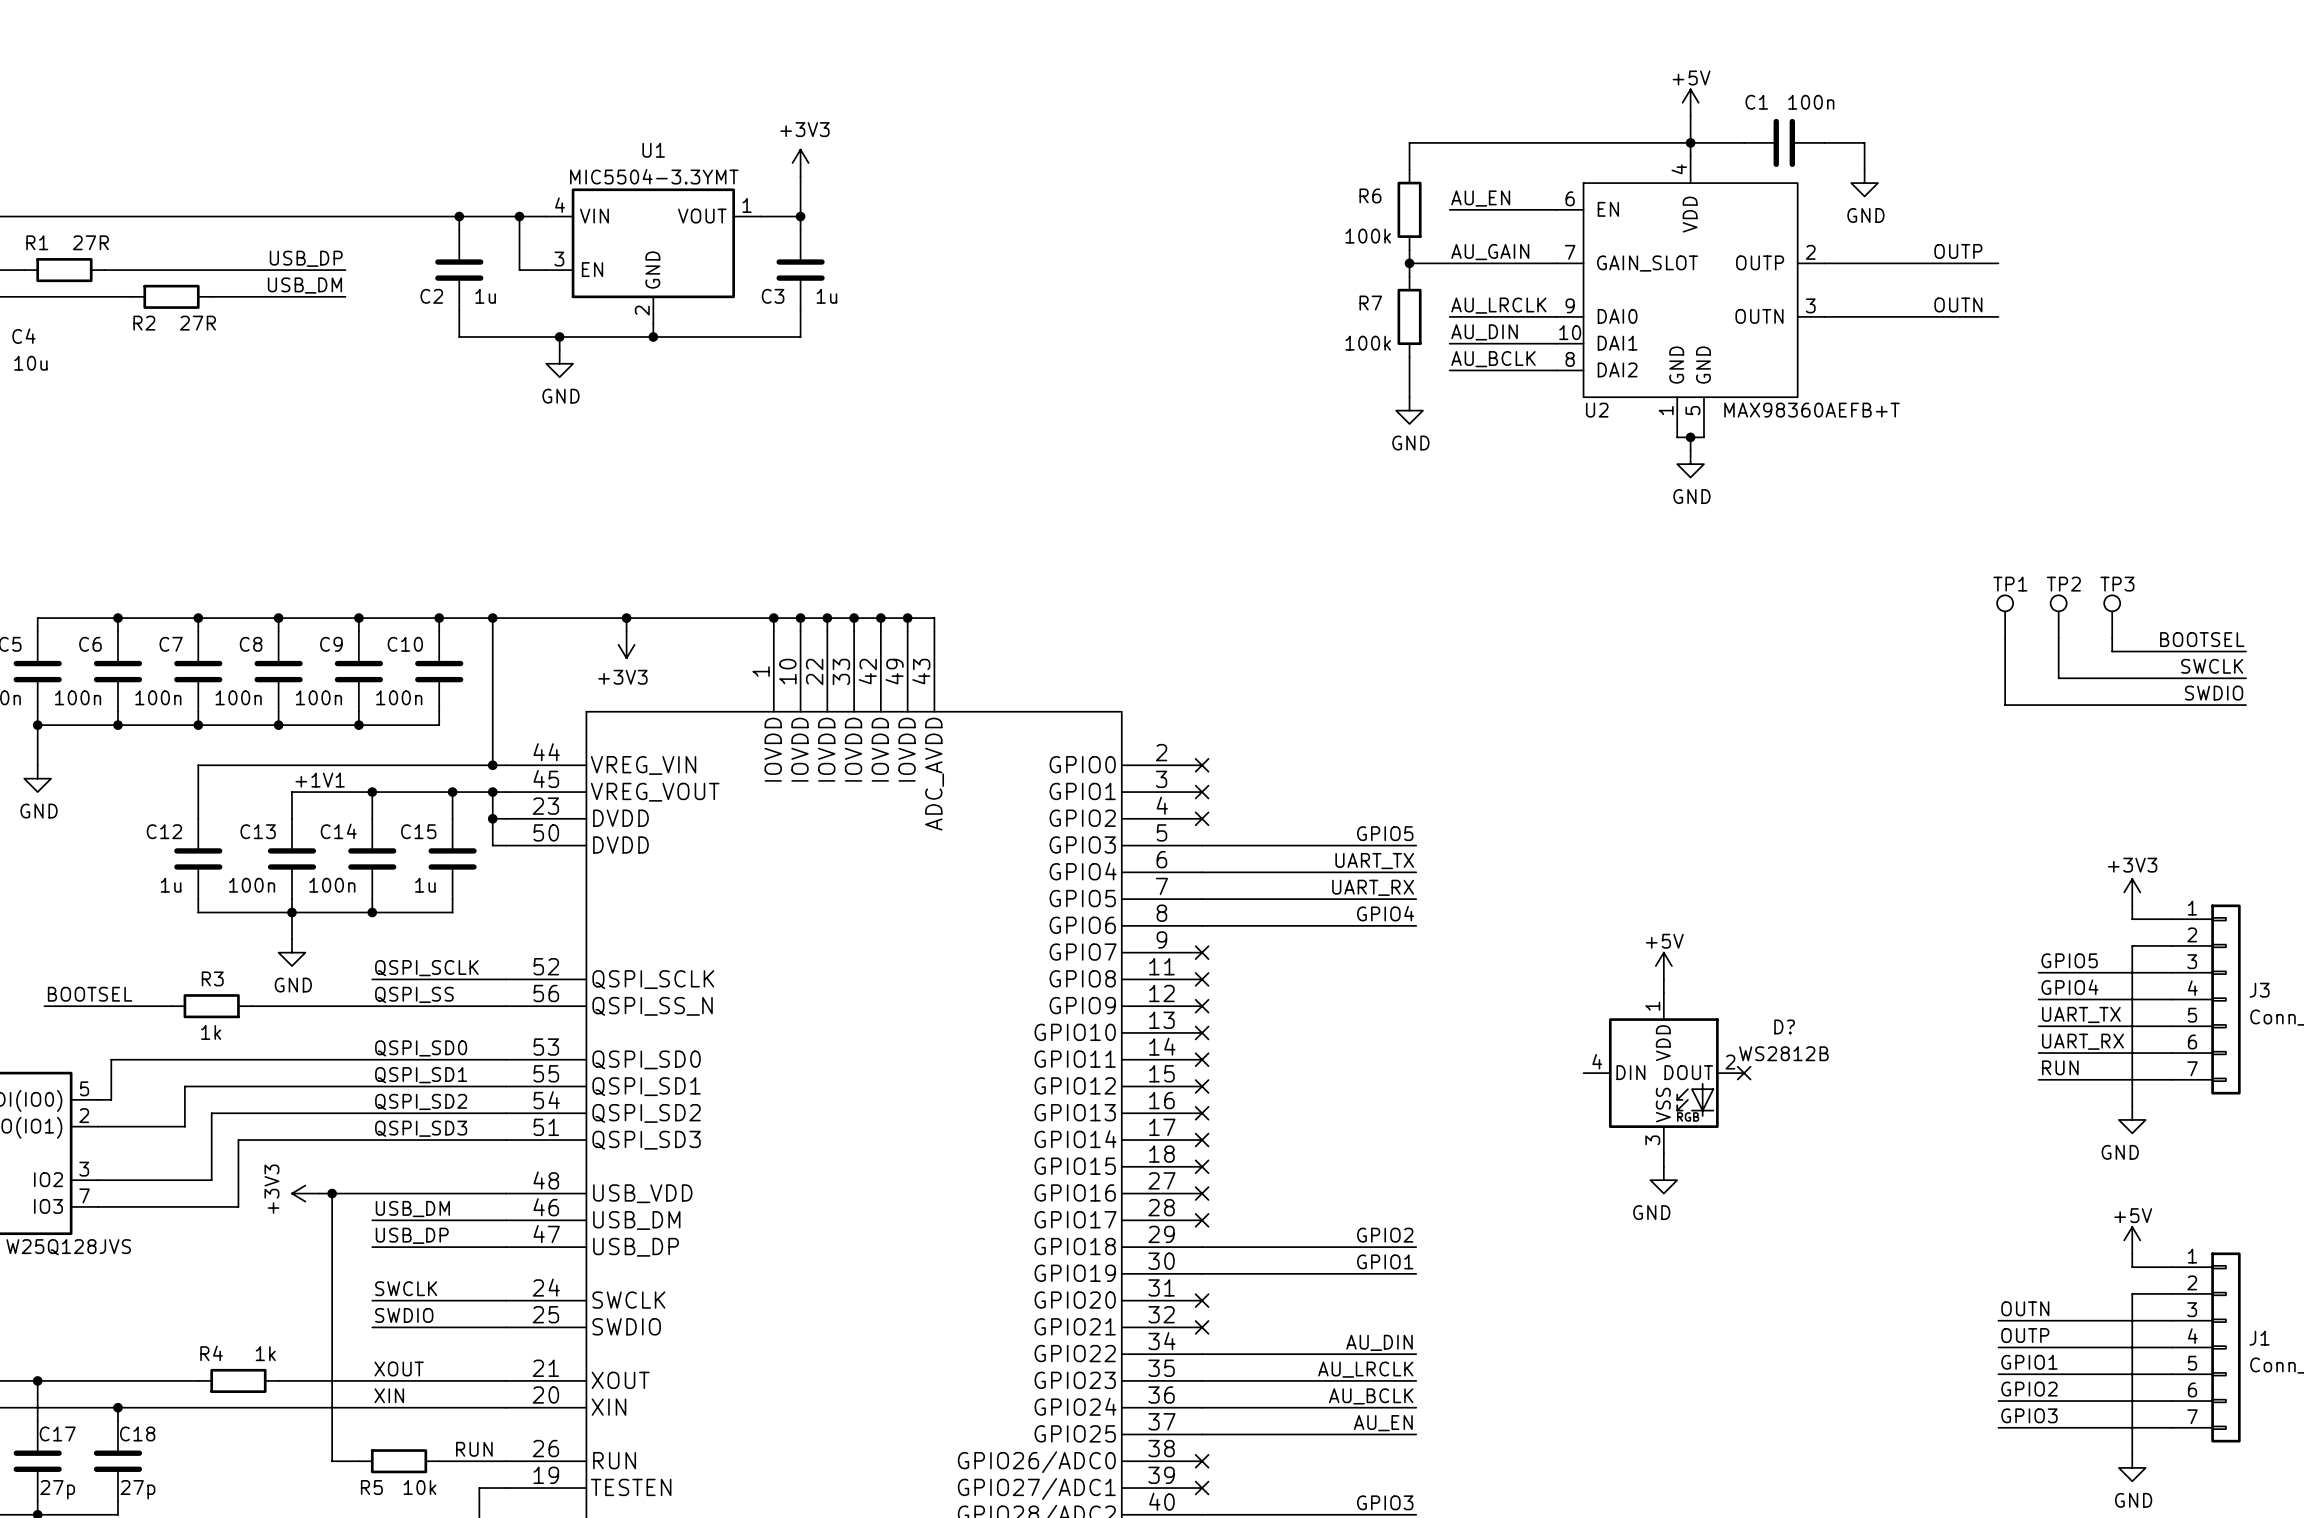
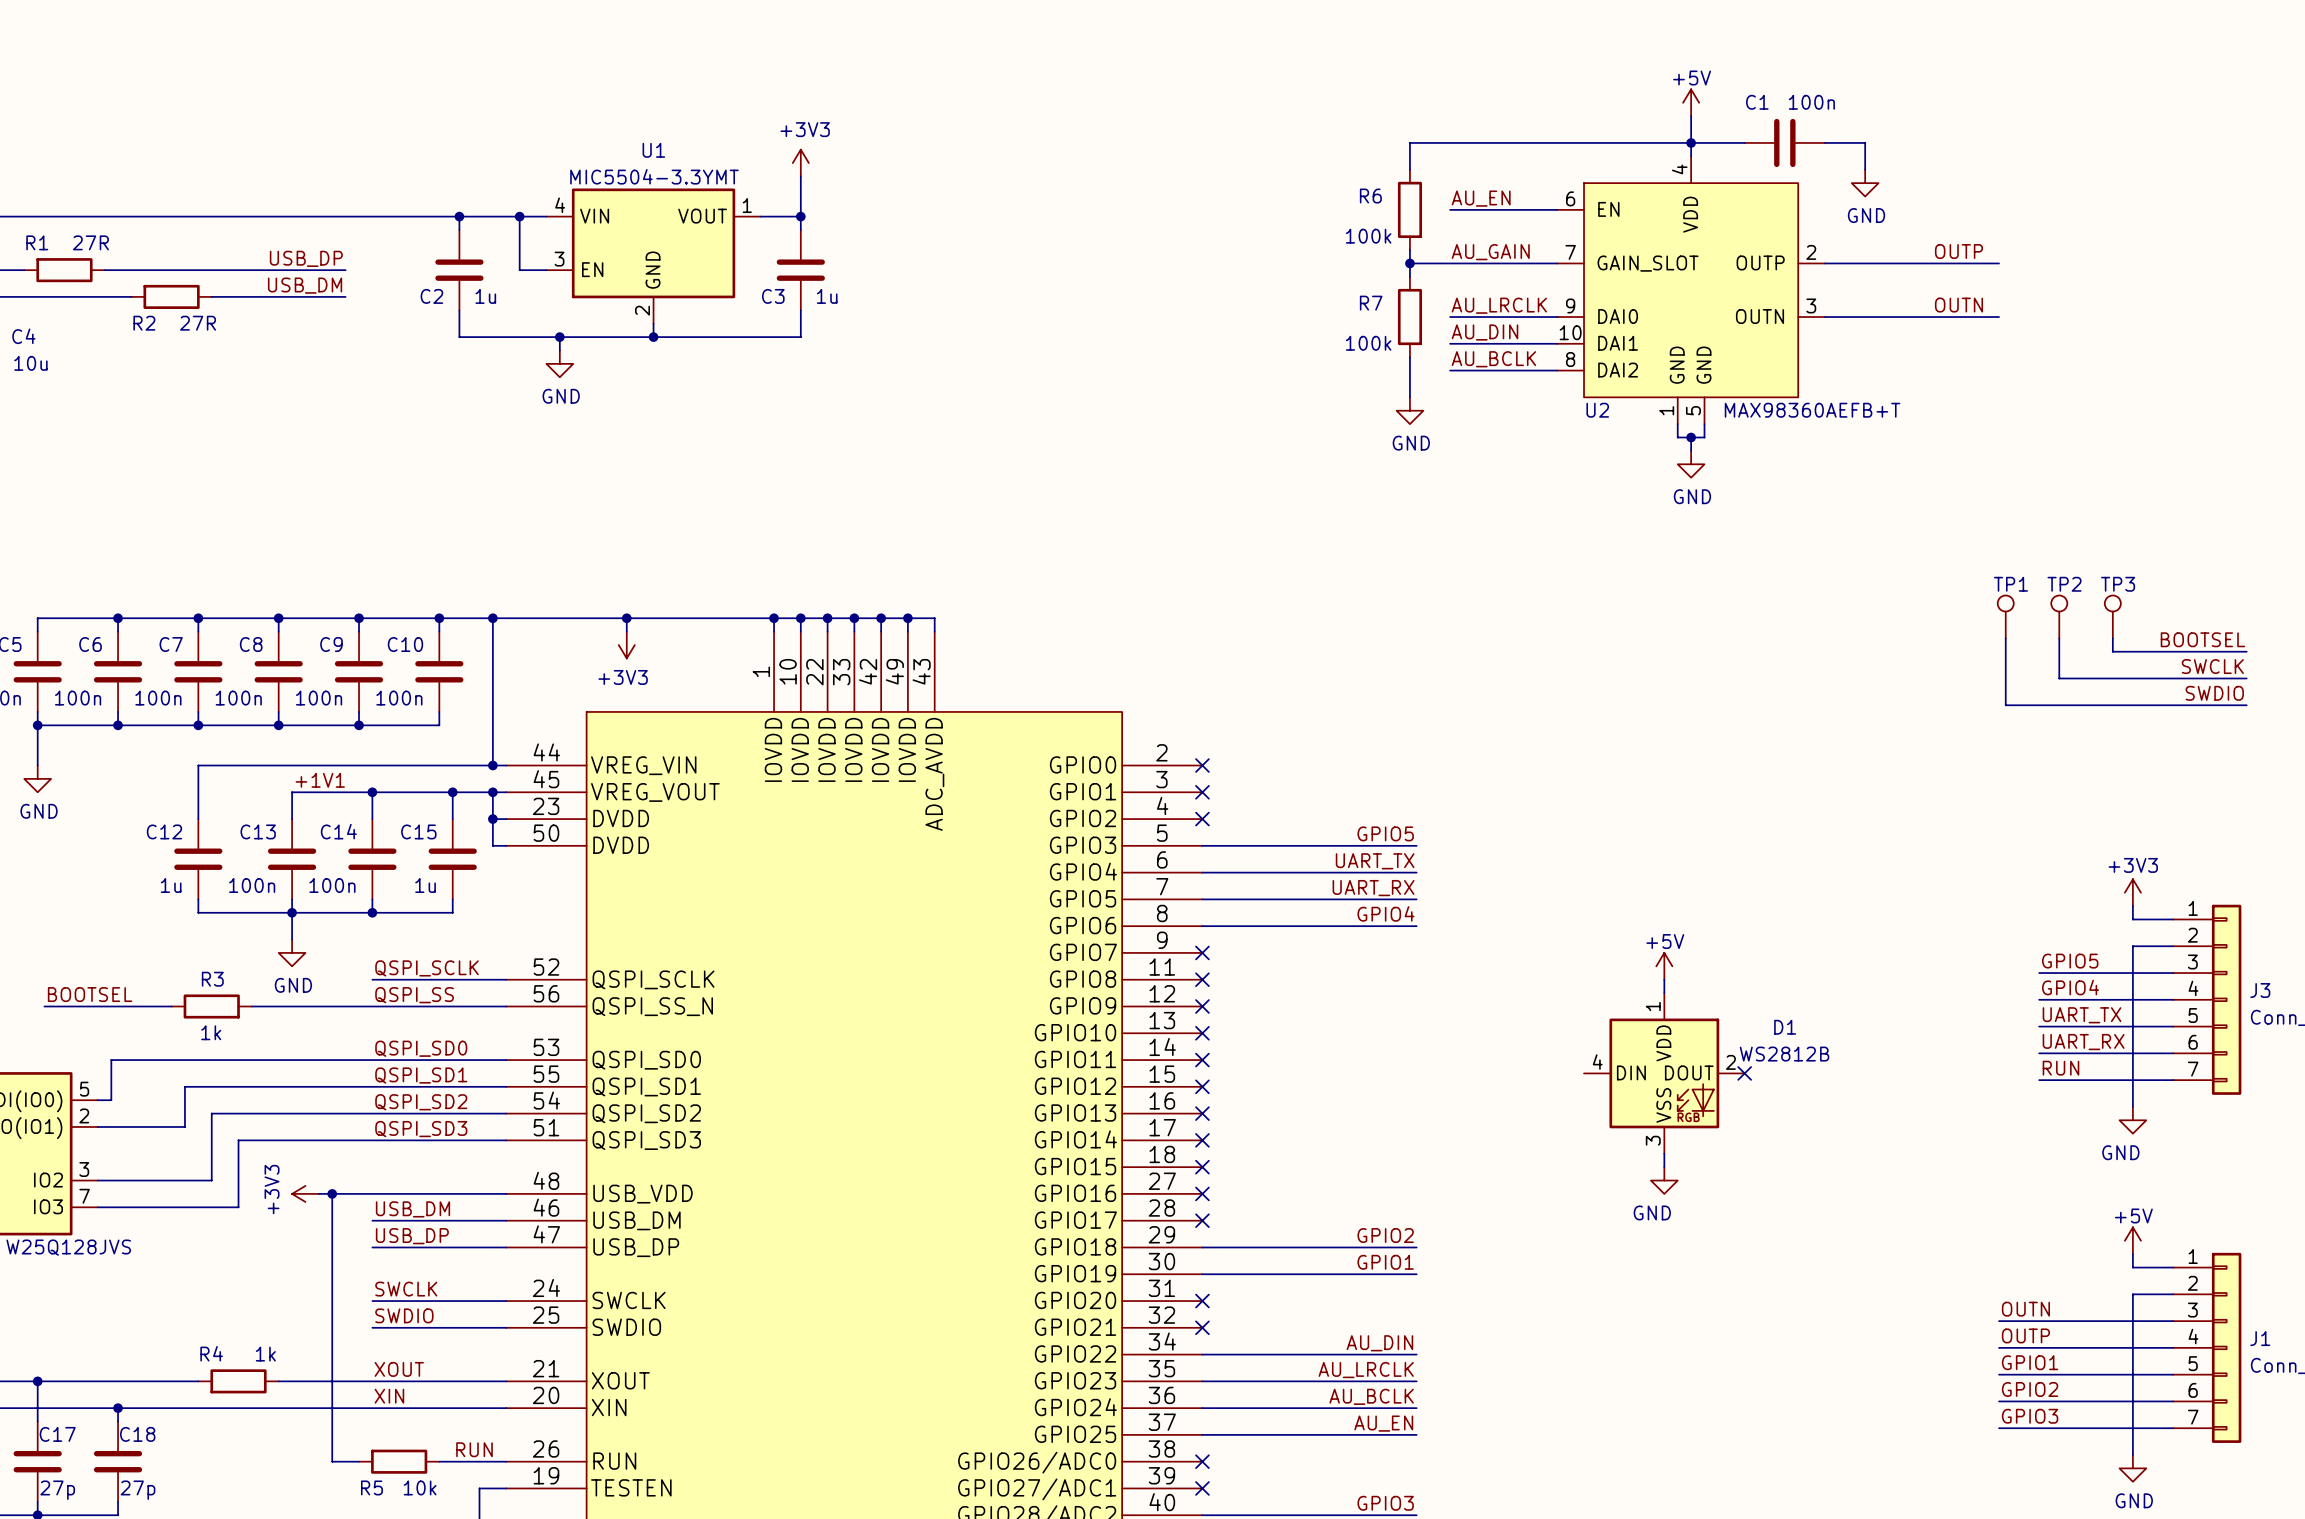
D? name: D? (1784, 1026) -> D1 (1785, 1027)

